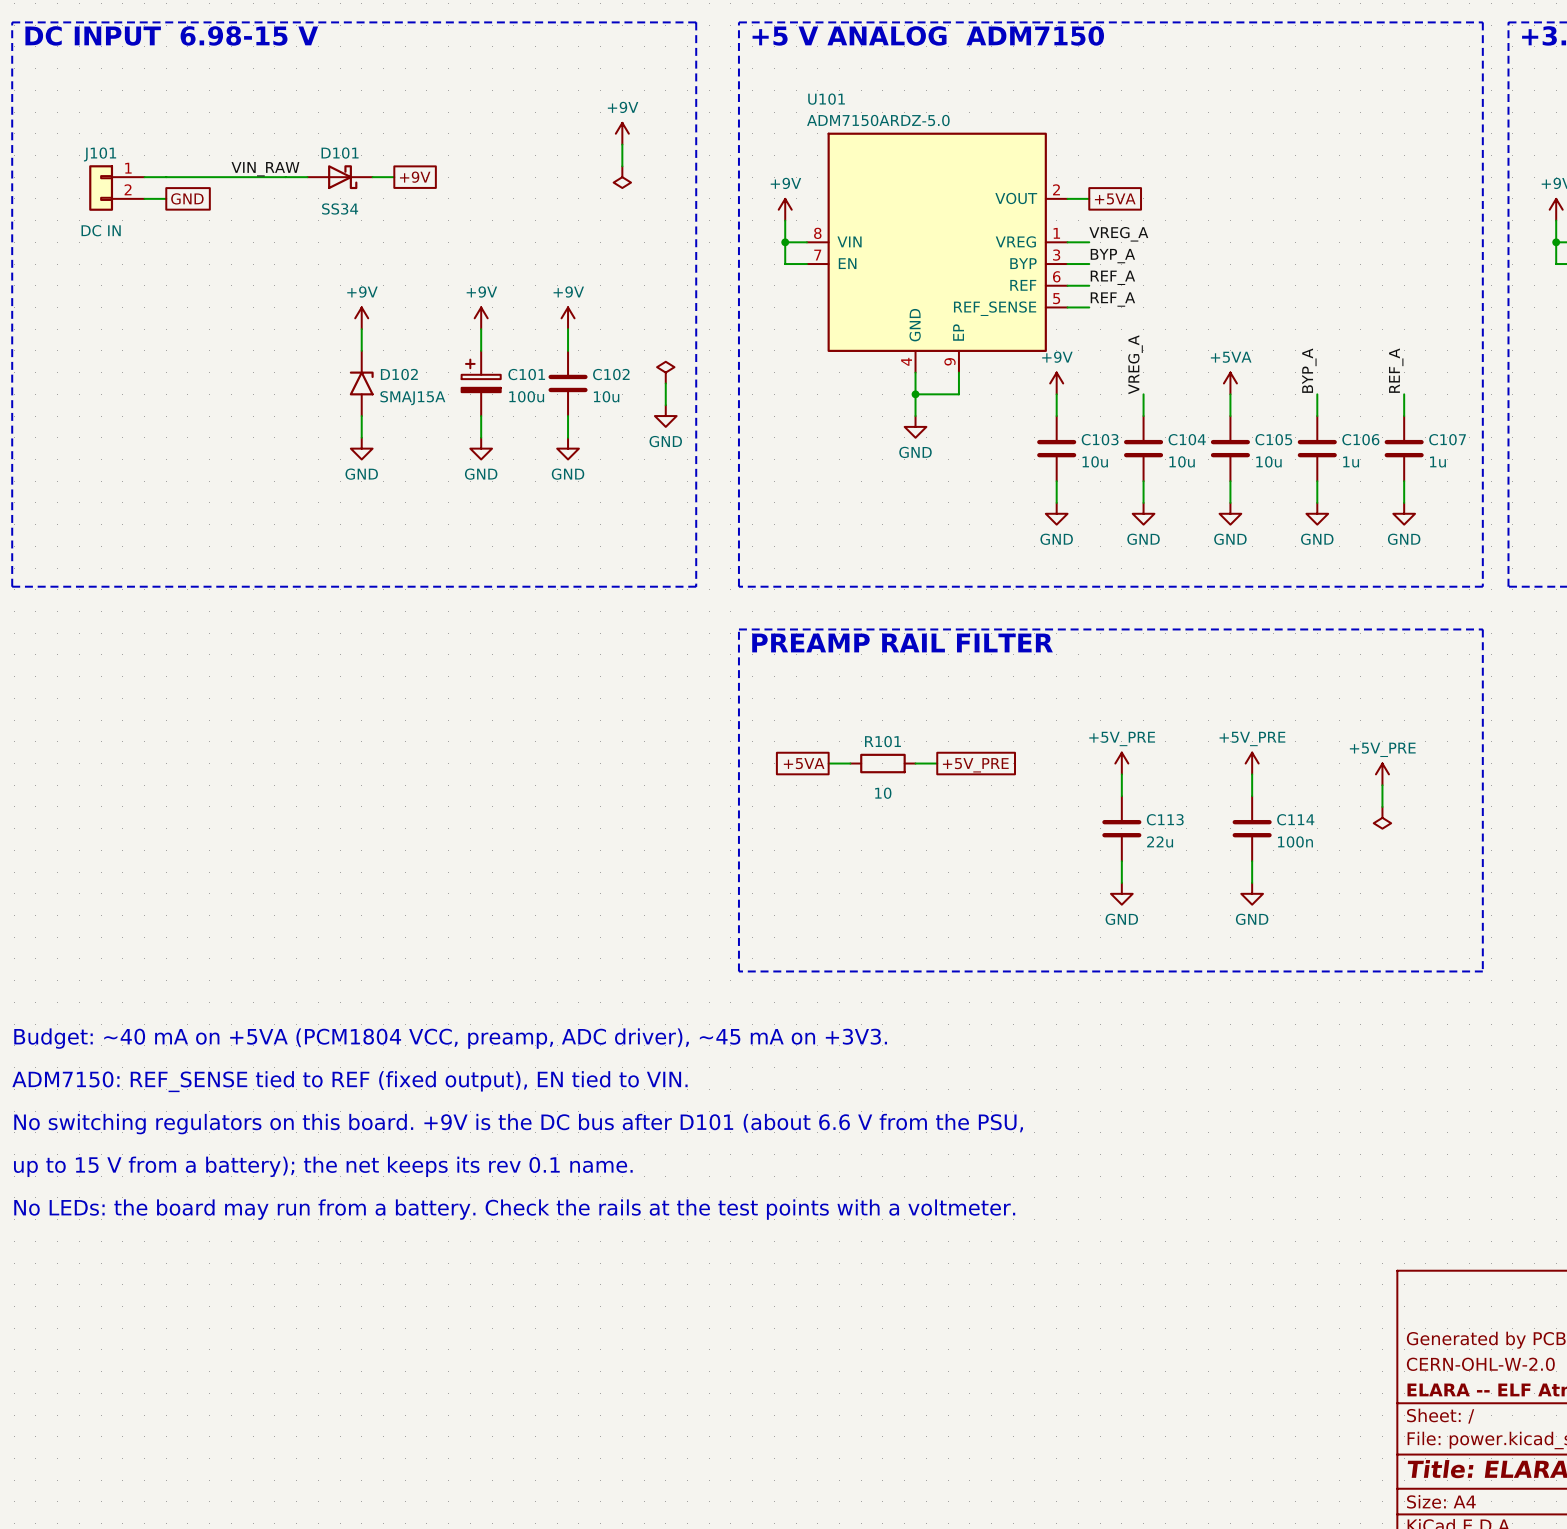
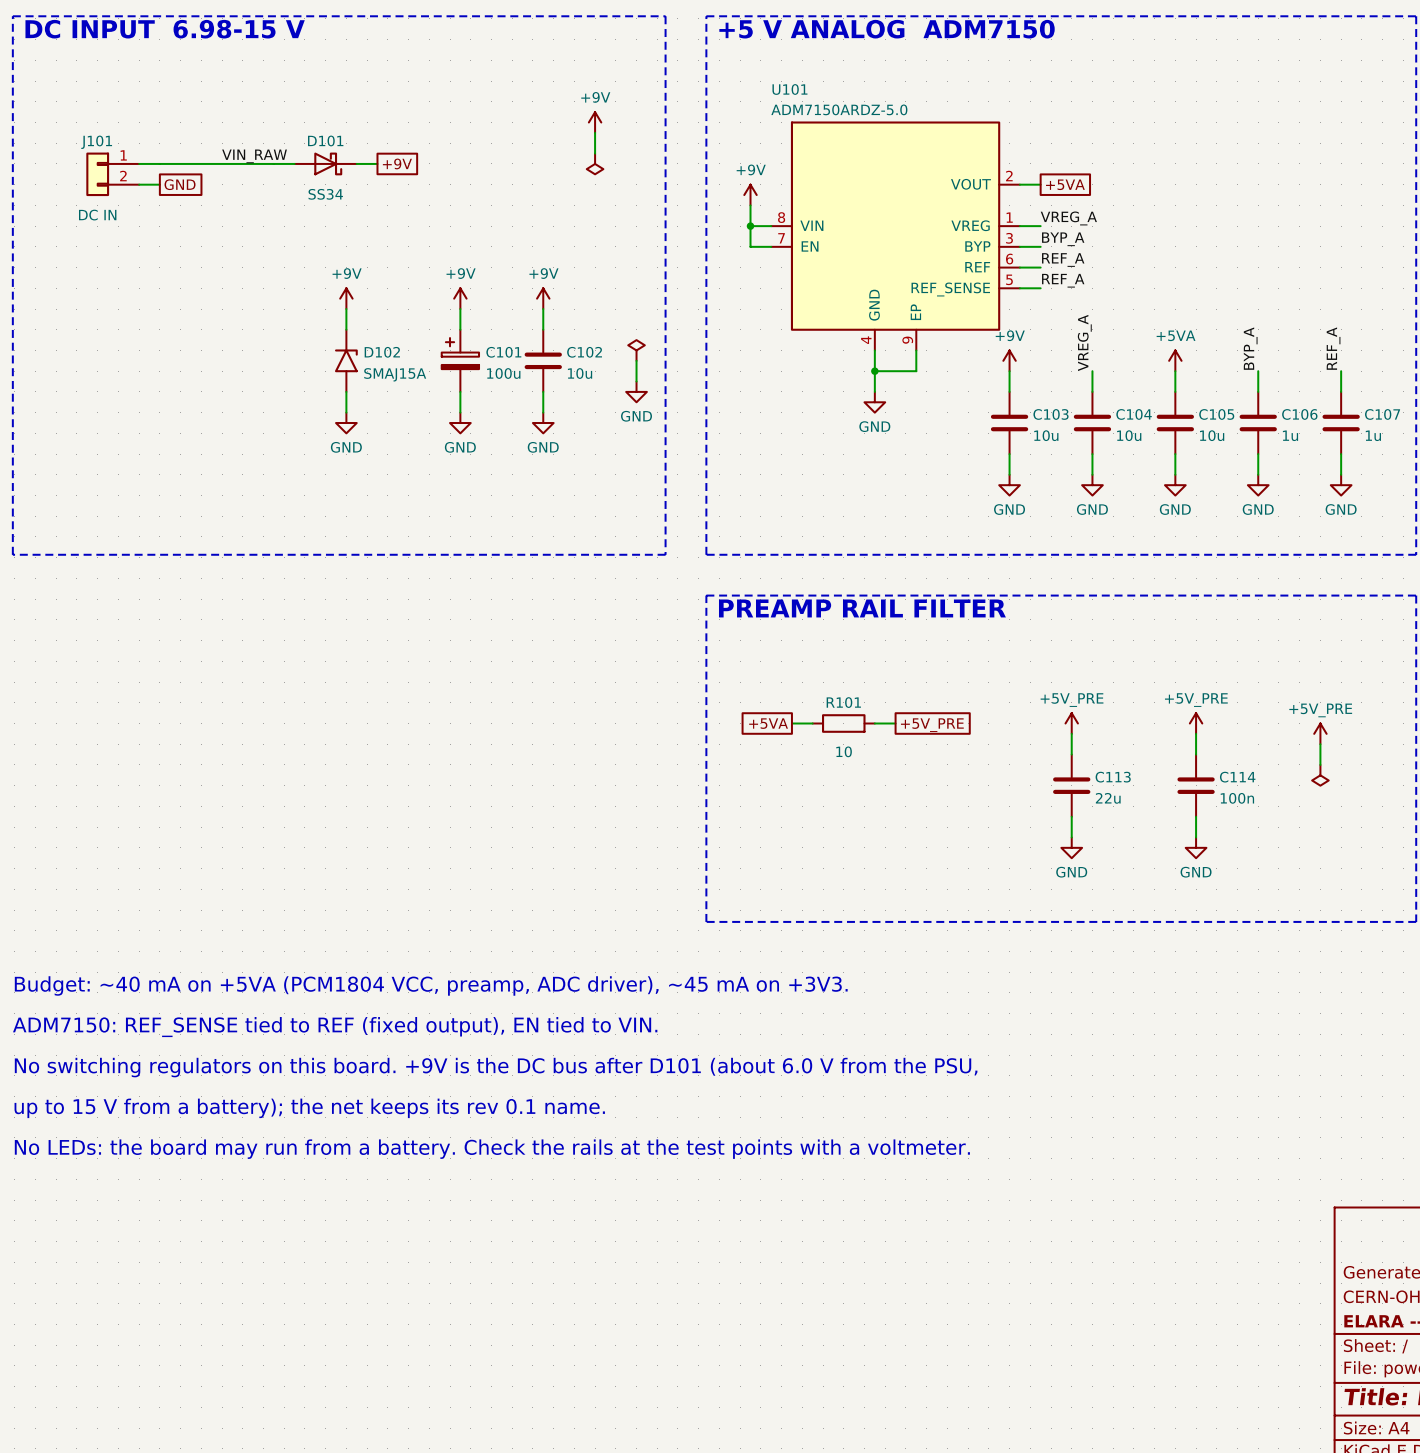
text: No switching regulators on this board. +9V is the DC bus after D101 (about 6.6 V from the PSU, (518, 1124) -> No switching regulators on this board. +9V is the DC bus after D101 (about 6.0 V from the PSU, (496, 1067)

